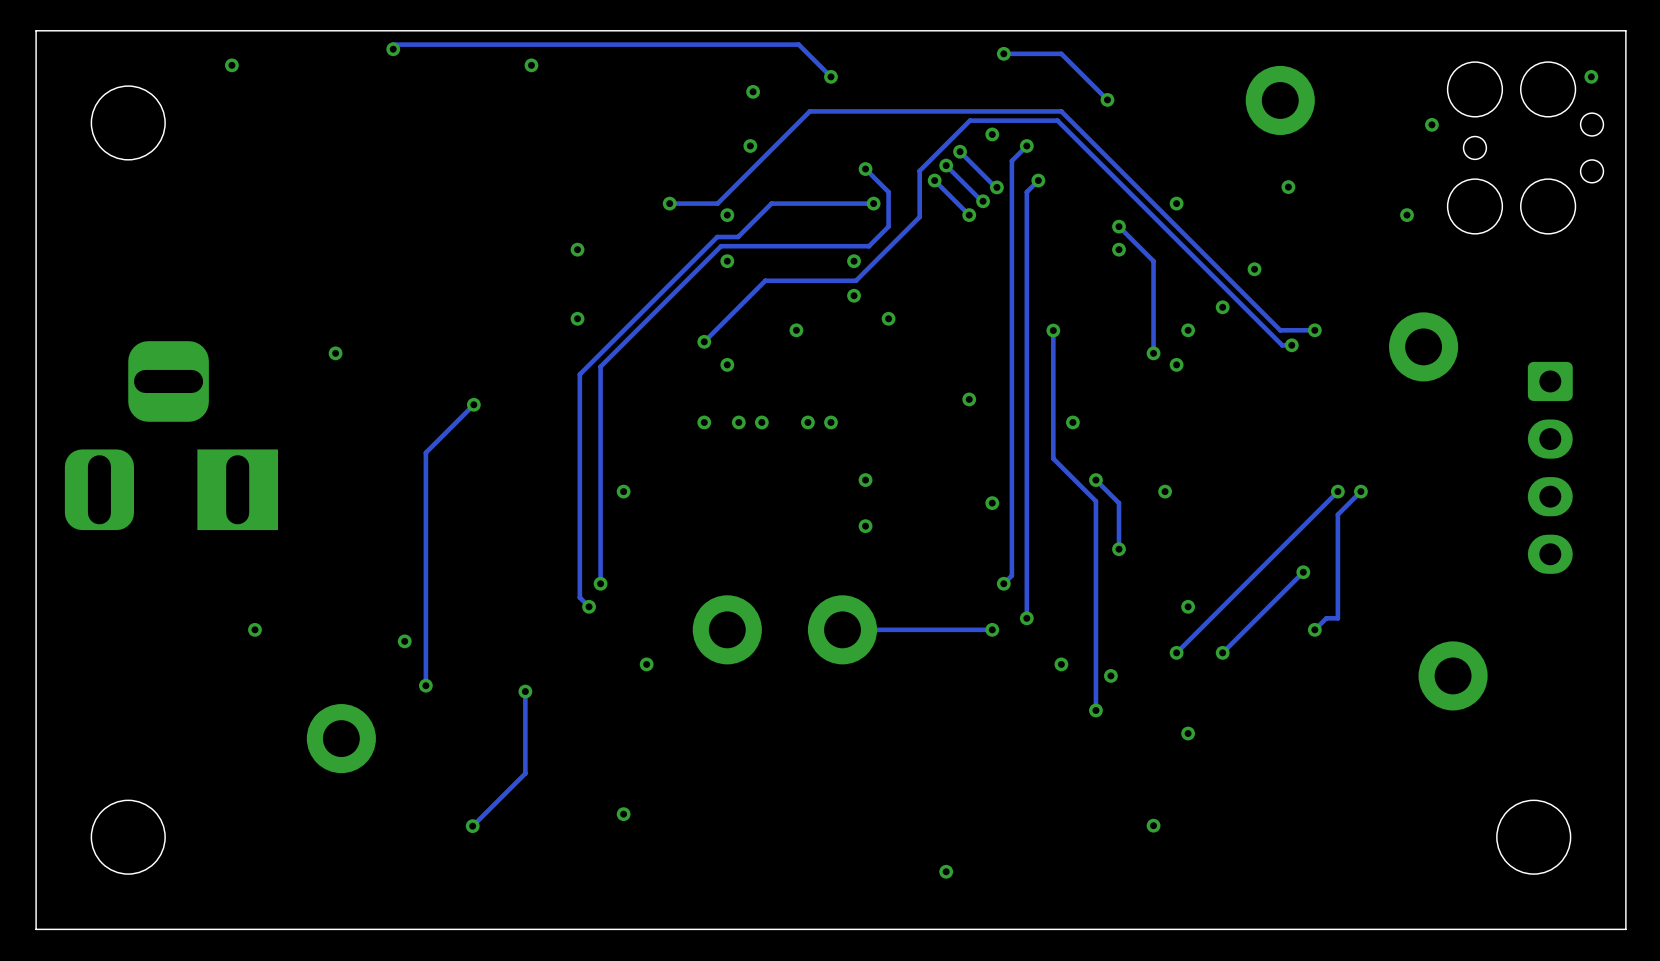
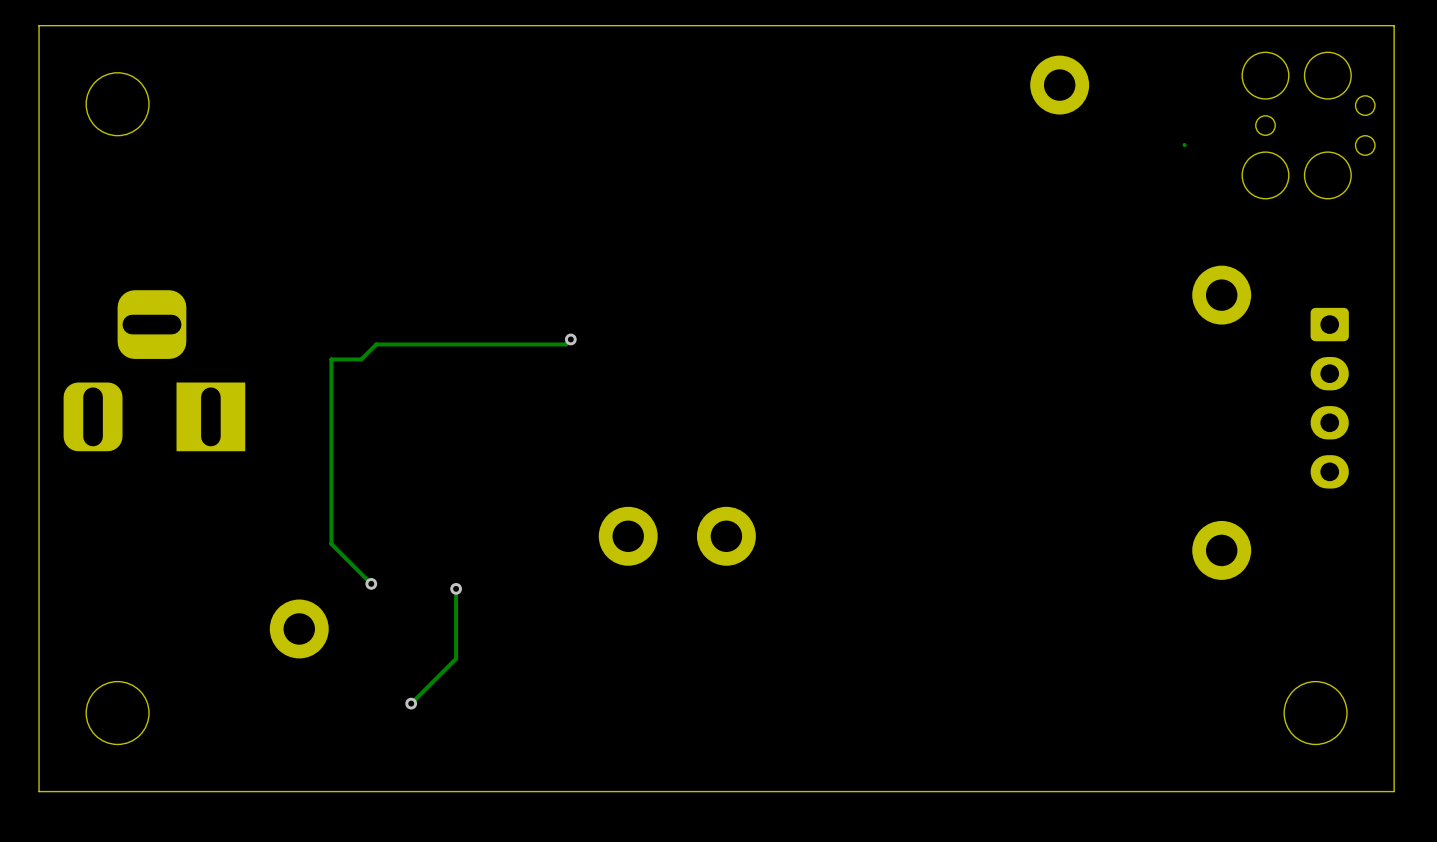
track: (393, 44) (798, 44) (830, 76) -> none
via: (393, 49) -> none
track: (1003, 53) (1061, 53) (1107, 99) -> none
via: (1003, 53) -> none
via: (231, 65) -> none
via: (531, 65) -> none
via: (830, 76) -> none
via: (1591, 76) -> none
via: (753, 91) -> none
via: (1107, 99) -> none
part position: (1280, 100) -> (1059, 85)
via: (1431, 124) -> none
via: (992, 134) -> none
via: (750, 145) -> none
track: (1026, 145) (1011, 160) (1011, 575) (1003, 583) -> none
via: (1026, 145) -> none
track: (960, 151) (996, 187) -> none
via: (960, 151) -> none
track: (946, 165) (983, 201) -> none
via: (946, 165) -> none
track: (865, 169) (888, 192) (888, 226) (869, 246) (721, 246) (600, 366) (600, 583) -> none
via: (865, 169) -> none
track: none -> (1184, 144) (1184, 145)
track: (934, 180) (969, 215) -> none
via: (934, 180) -> none
track: (1038, 180) (1026, 192) (1026, 618) -> none
via: (1038, 180) -> none
via: (996, 187) -> none
via: (1288, 187) -> none
via: (983, 201) -> none
track: (669, 203) (717, 203) (809, 111) (1061, 111) (1280, 330) (1314, 330) -> none
via: (669, 203) -> none
track: (873, 203) (771, 203) (738, 237) (717, 237) (579, 374) (579, 597) (589, 606) -> none
via: (873, 203) -> none
via: (1176, 203) -> none
via: (727, 215) -> none
via: (969, 215) -> none
via: (1407, 215) -> none
track: (1118, 226) (1153, 261) (1153, 353) -> none
via: (1118, 226) -> none
via: (577, 249) -> none
via: (1118, 249) -> none
via: (727, 261) -> none
via: (854, 261) -> none
via: (1254, 269) -> none
via: (854, 295) -> none
via: (1222, 307) -> none
via: (577, 318) -> none
via: (888, 318) -> none
via: (796, 330) -> none
track: (1053, 330) (1053, 458) (1095, 501) (1095, 710) -> none
via: (1053, 330) -> none
via: (1188, 330) -> none
via: (1314, 330) -> none
track: (704, 341) (765, 280) (855, 280) (919, 217) (919, 170) (969, 120) (1057, 120) (1282, 345) (1291, 345) -> none
via: (704, 341) -> none
via: (1291, 345) -> none
via: (335, 353) -> none
via: (1153, 353) -> none
via: (727, 364) -> none
via: (1176, 364) -> none
via: none -> (570, 339)
via: (969, 399) -> none
track: (473, 404) (425, 452) (425, 685) -> (570, 339) (565, 344) (376, 344) (361, 359) (331, 359) (331, 543) (371, 583)
via: (473, 404) -> none
via: (704, 422) -> none
via: (738, 422) -> none
via: (761, 422) -> none
via: (807, 422) -> none
via: (830, 422) -> none
via: (1072, 422) -> none
via: (865, 480) -> none
track: (1095, 480) (1118, 503) (1118, 549) -> none
via: (1095, 480) -> none
via: (623, 491) -> none
via: (1165, 491) -> none
track: (1337, 491) (1176, 652) -> none
via: (1337, 491) -> none
track: (1360, 491) (1337, 514) (1337, 618) (1326, 618) (1314, 629) -> none
via: (1360, 491) -> none
via: (992, 503) -> none
via: (865, 526) -> none
via: (1118, 549) -> none
track: (1303, 572) (1222, 652) -> none
via: (1303, 572) -> none
via: (600, 583) -> none
via: (1003, 583) -> none
via: (589, 606) -> none
via: (1188, 606) -> none
via: (1026, 618) -> none
via: (254, 629) -> none
track: (992, 629) (842, 629) -> none
via: (992, 629) -> none
via: (1314, 629) -> none
via: (404, 641) -> none
via: (1176, 652) -> none
via: (1222, 652) -> none
via: (646, 664) -> none
via: (1061, 664) -> none
via: (1110, 675) -> none
part position: (1453, 675) -> (1221, 550)
via: (1095, 710) -> none
via: (1188, 733) -> none
via: (623, 814) -> none
via: (1153, 825) -> none
via: (946, 871) -> none

